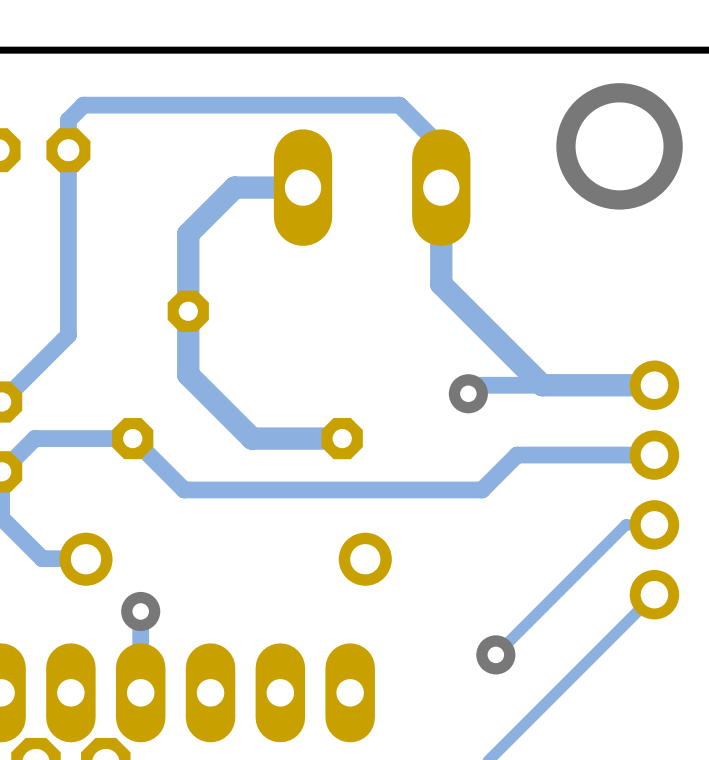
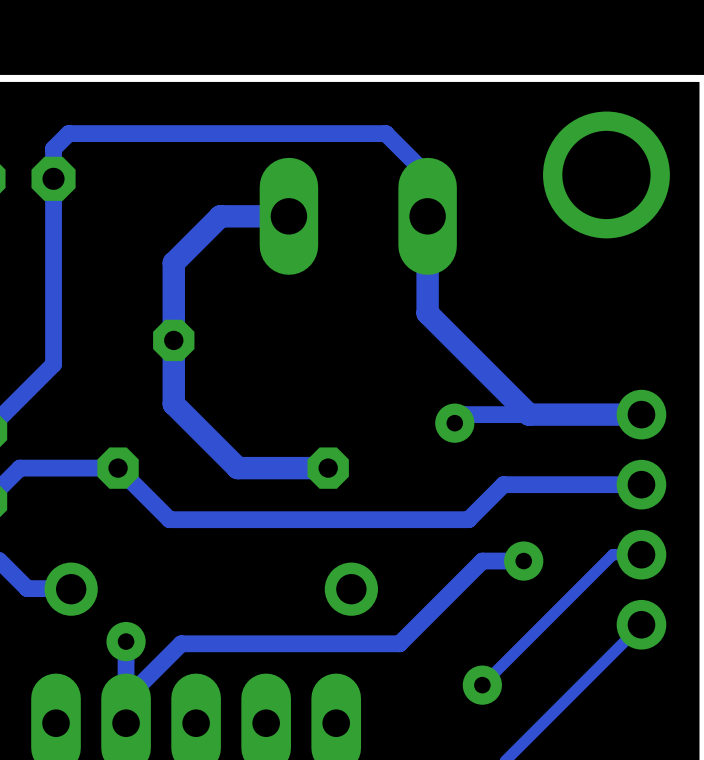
track: none -> (523, 561) (482, 561) (399, 643) (181, 643) (126, 698)
via: none -> (523, 561)

